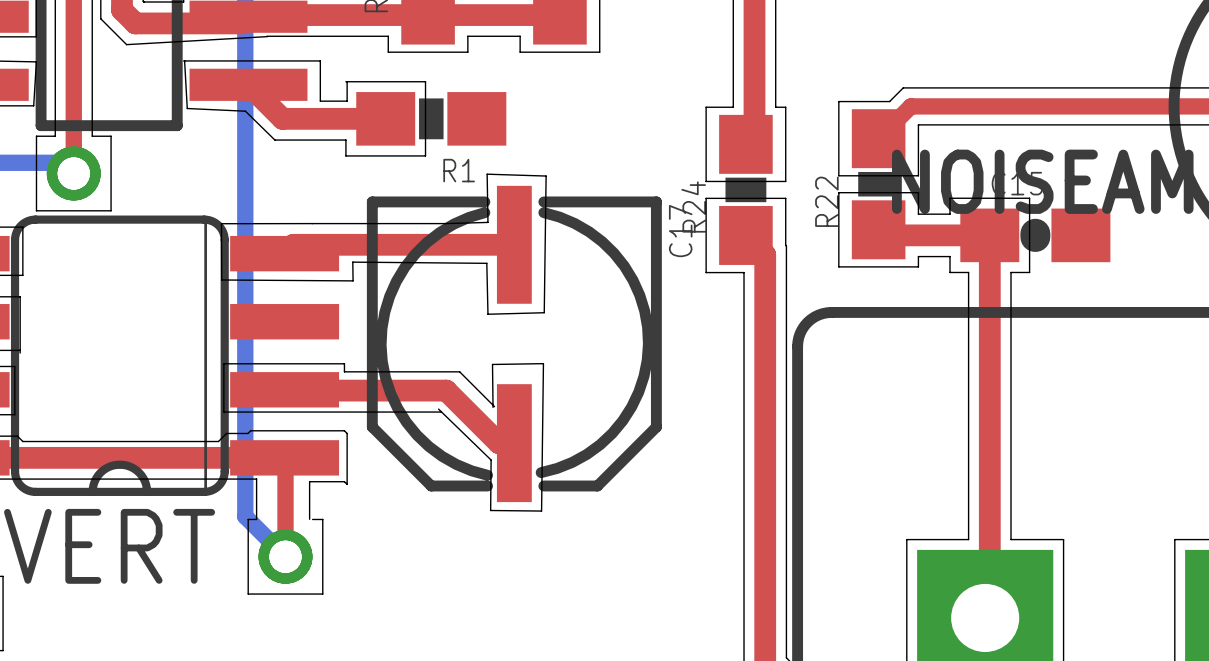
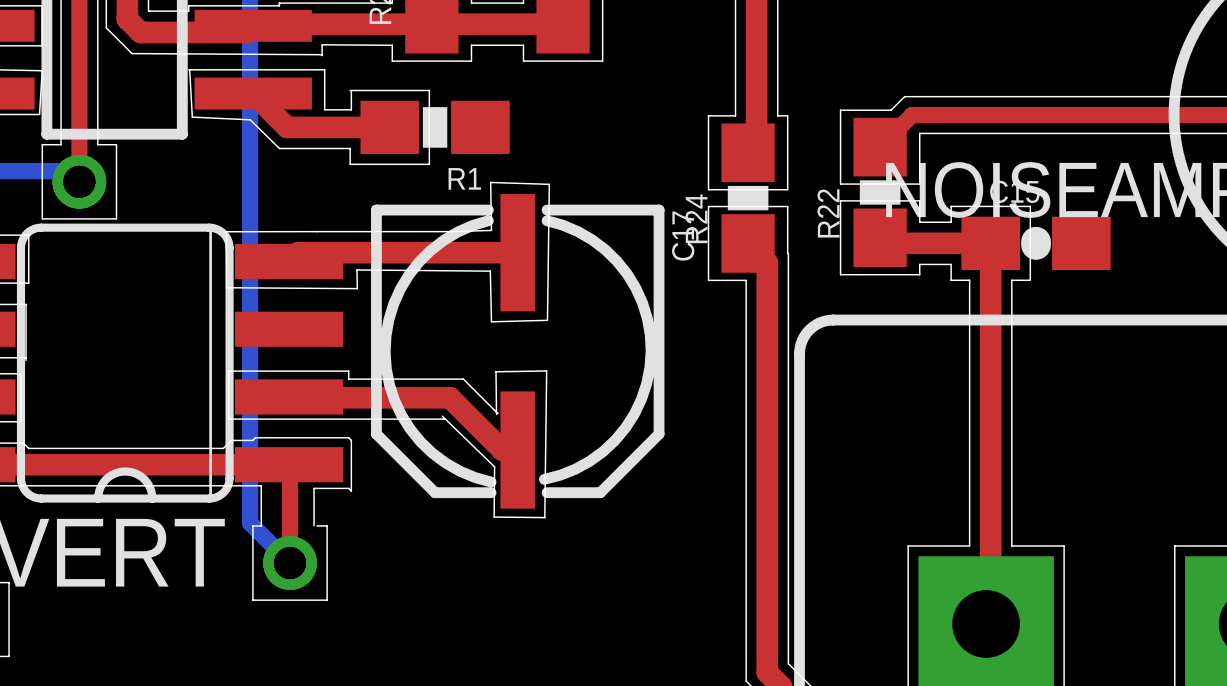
board edge: (266, 36) (388, 36) -> (322, 44) (392, 45)
board edge: (267, 36) (126, 44) -> (322, 54) (131, 53)
board edge: none -> (322, 45) (322, 55)

